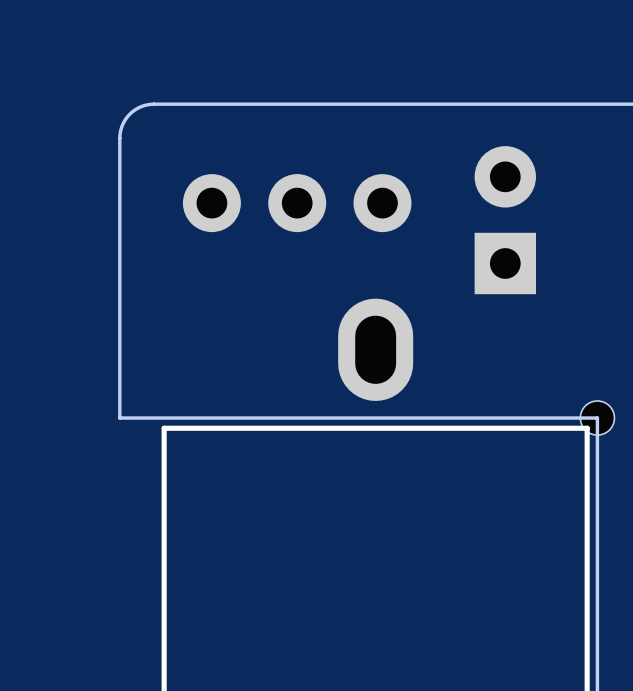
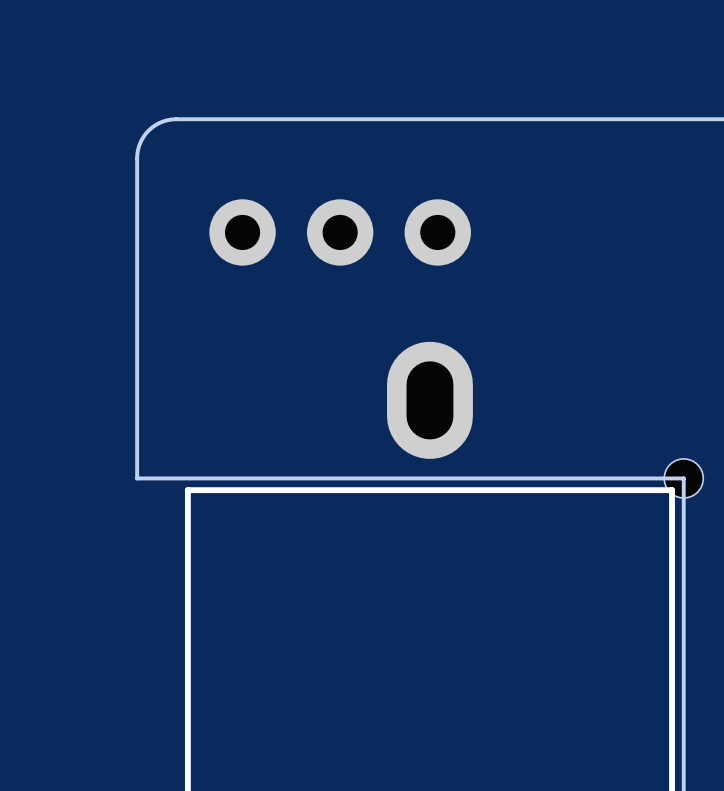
part: (505, 220) -> none

